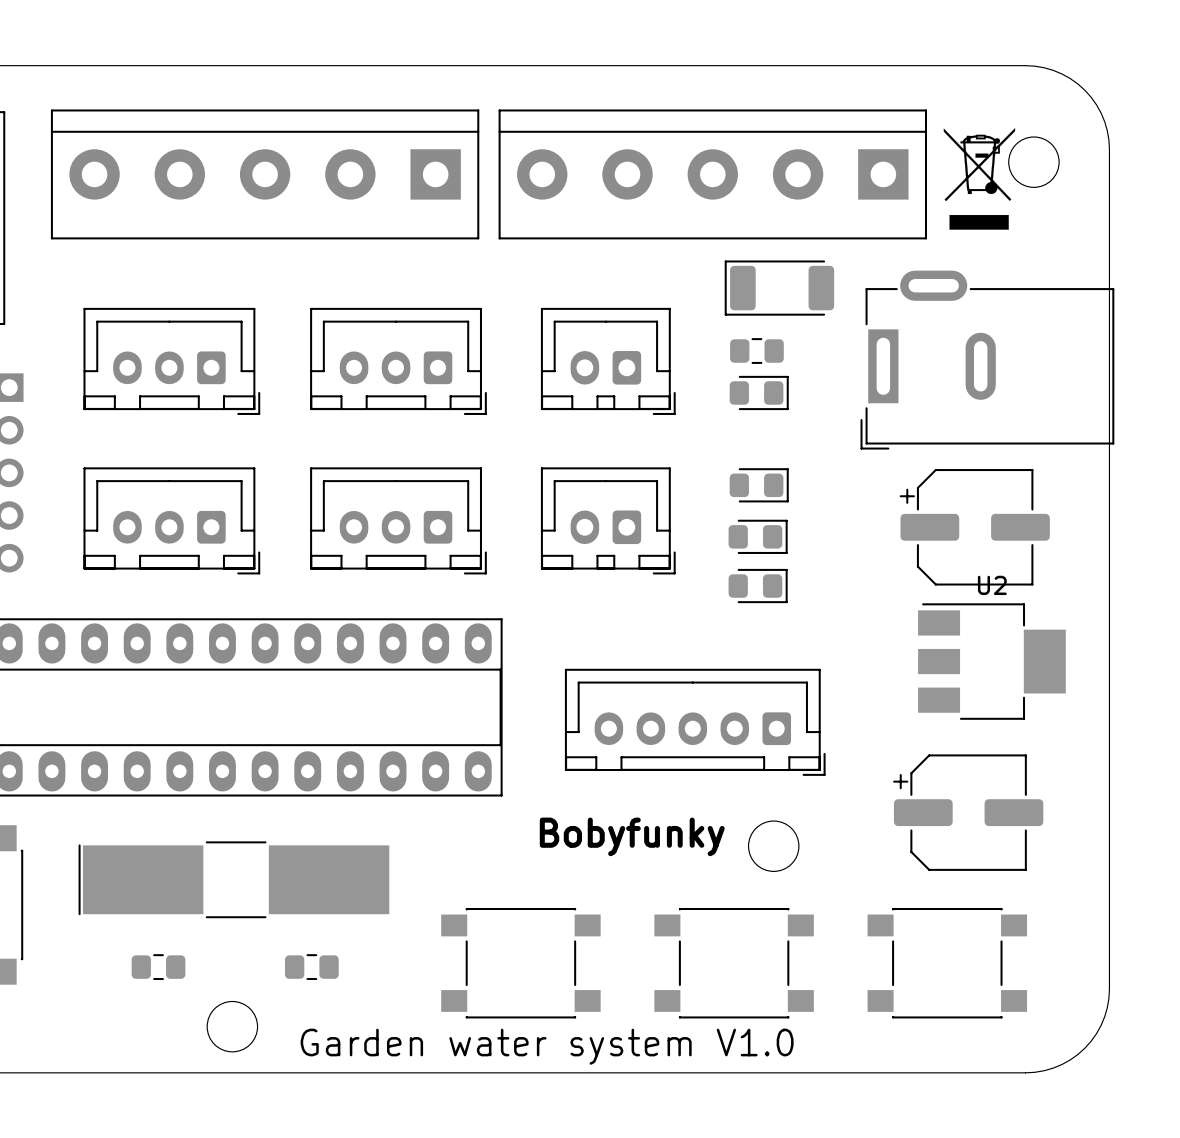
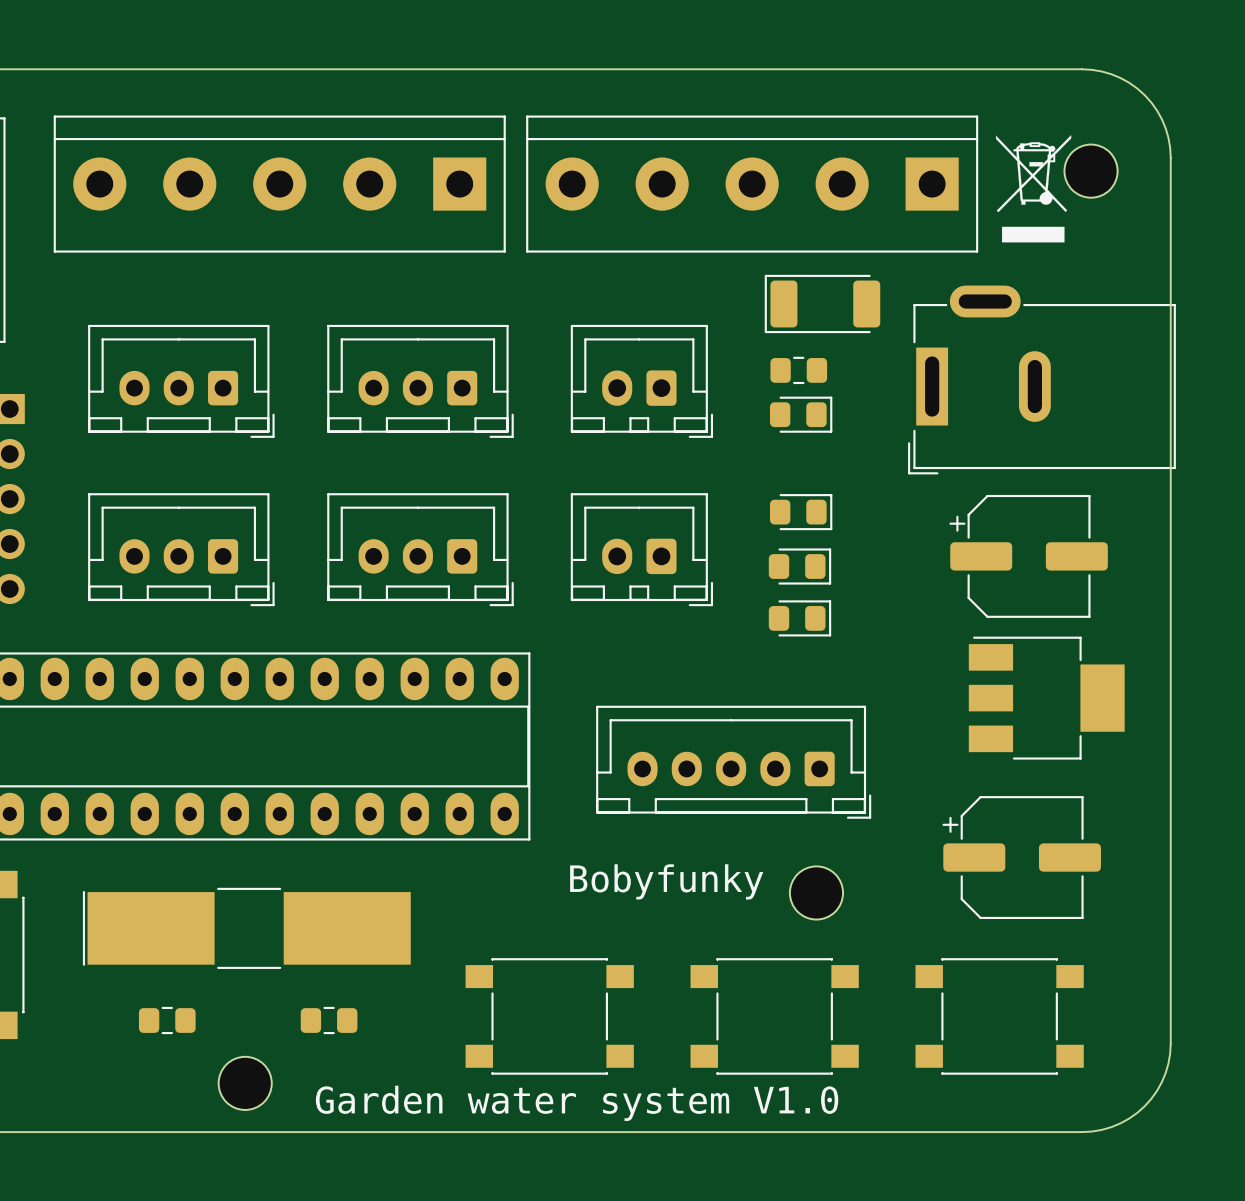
U2 name: U2 (992, 585) -> none

